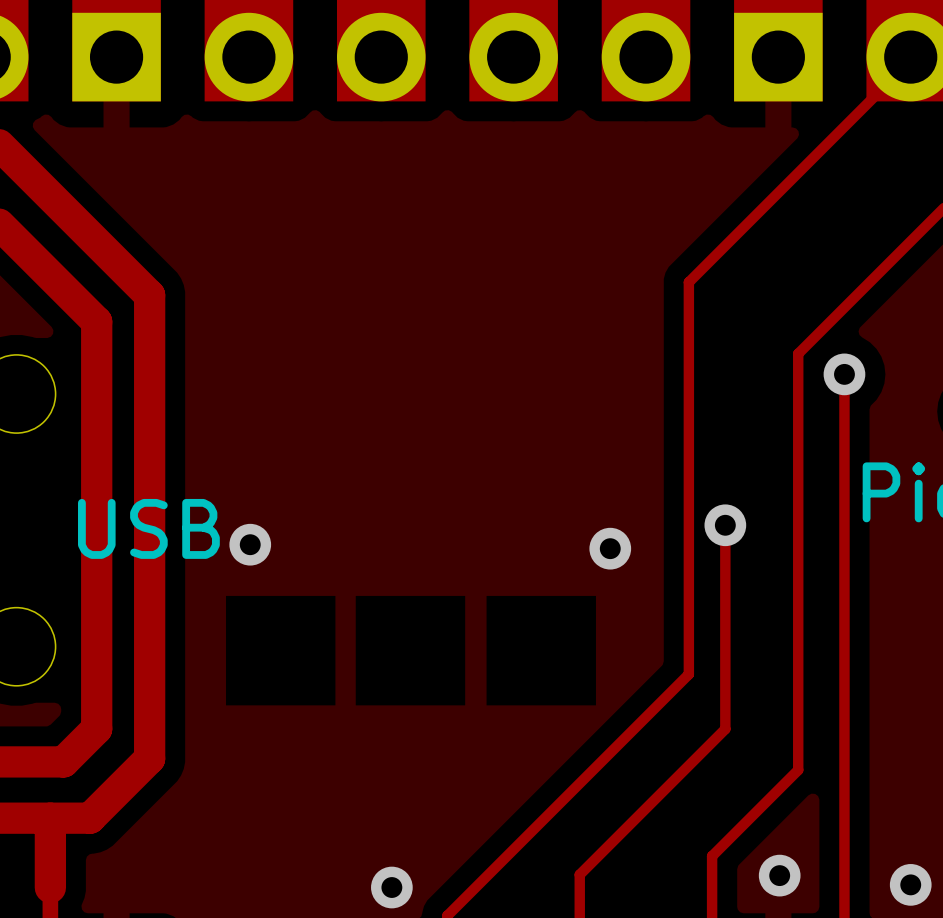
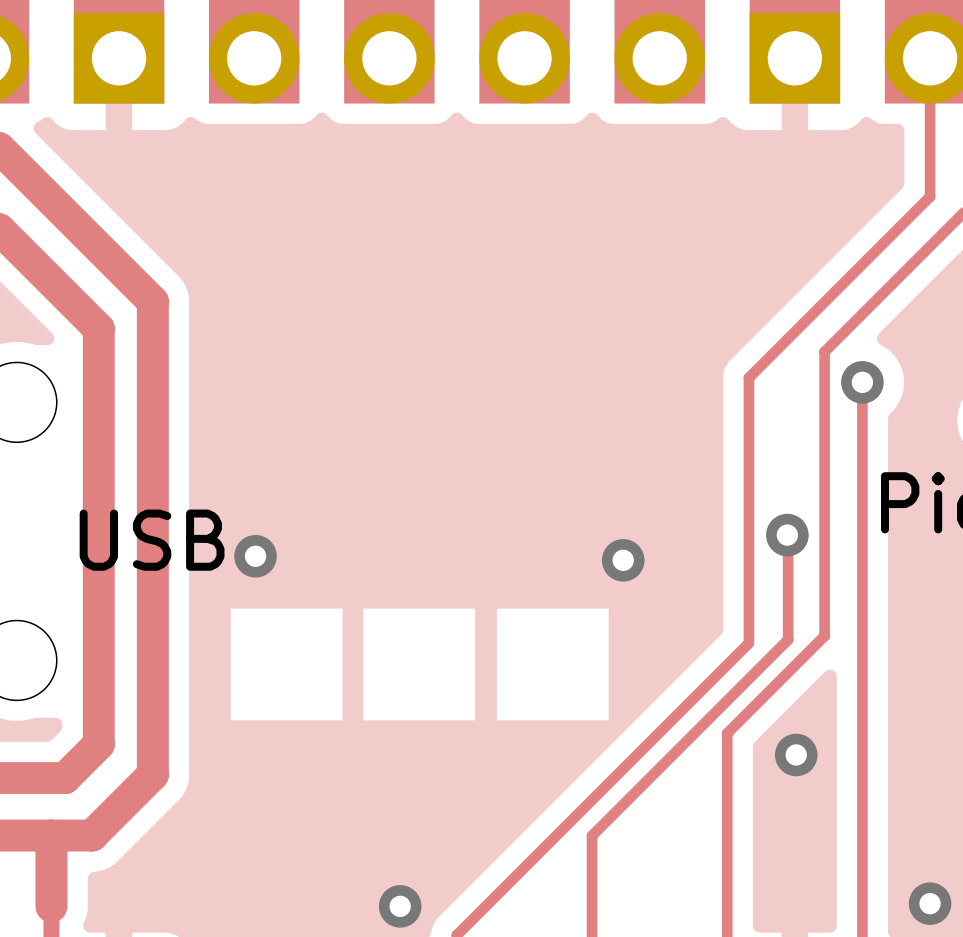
track: (910, 60) (688, 282) (688, 674) -> (930, 61) (930, 196) (748, 377) (748, 643) (703, 688)
track: (807, 344) (798, 353) (798, 770) (712, 856) -> (824, 351) (824, 636) (727, 733) (727, 874)
track: (725, 525) (725, 729) (579, 874) -> (787, 535) (788, 639) (592, 835) (592, 893)
via position: (725, 525) -> (787, 535)
via: none -> (796, 754)
via: (779, 875) -> none

